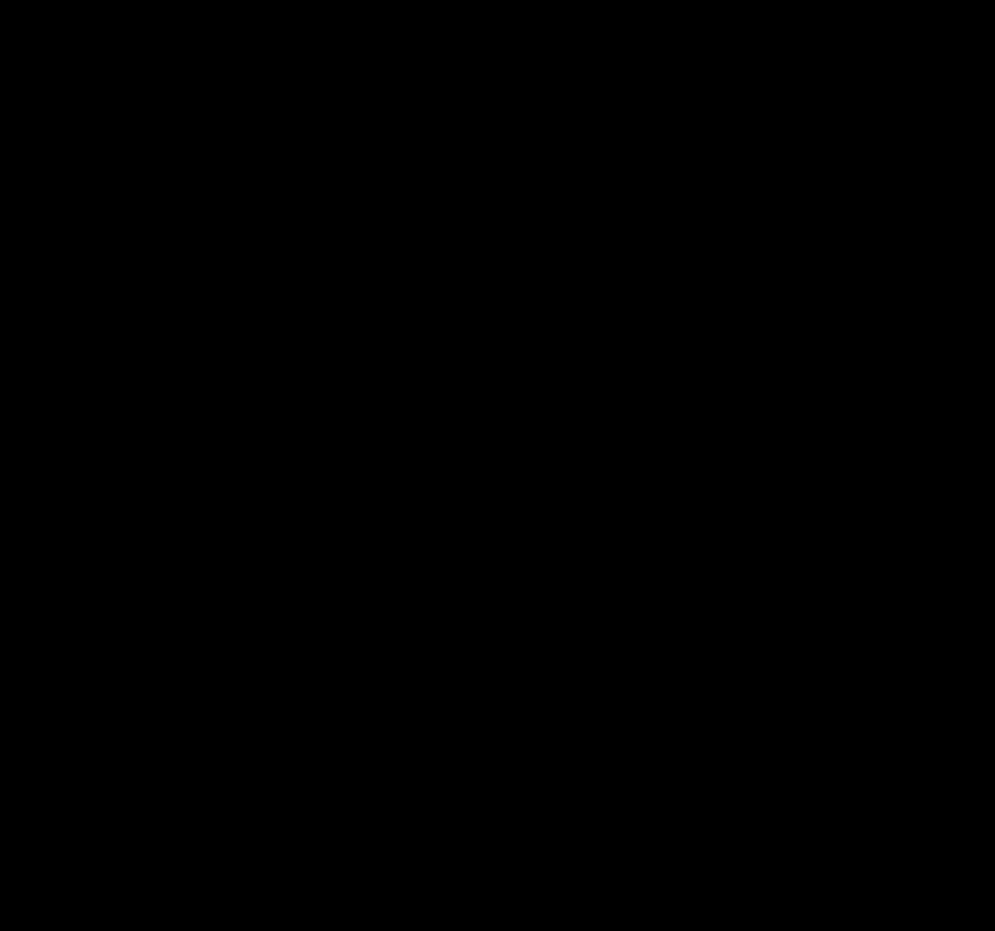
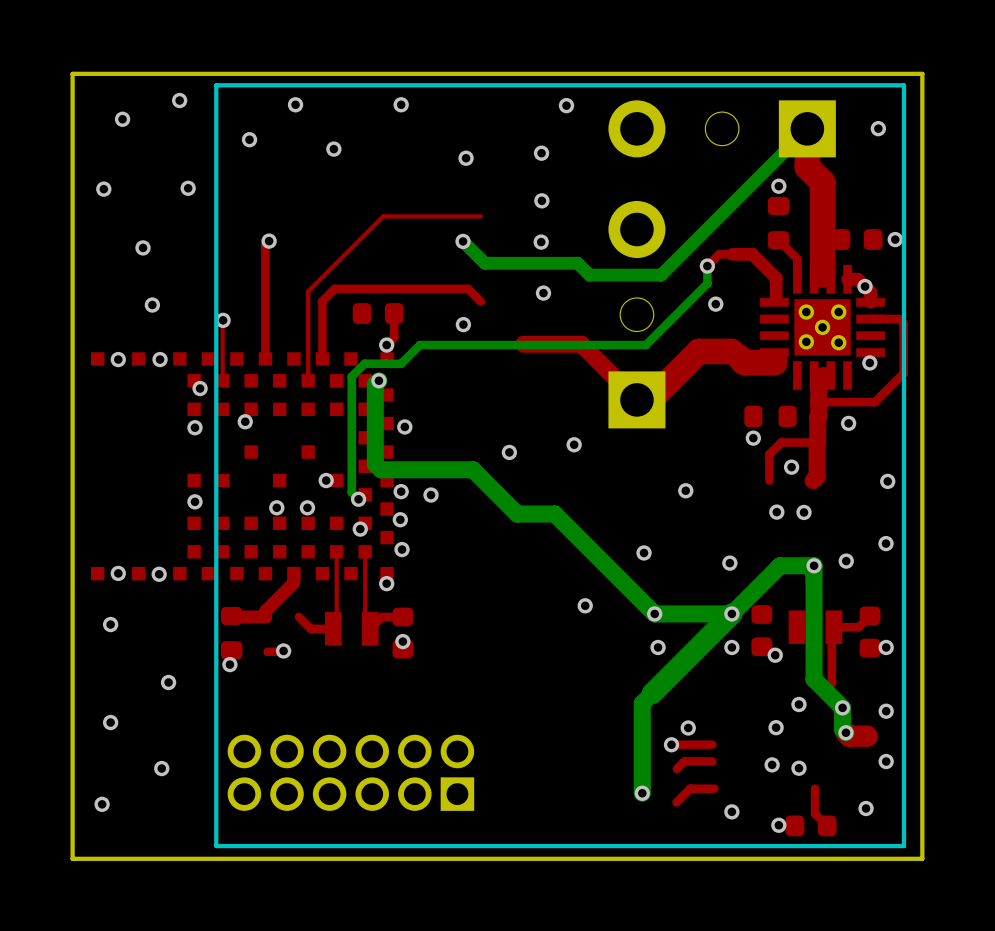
board edge: none -> (922, 73) (72, 73) (72, 858) (922, 858) (922, 73)
line: none -> (903, 85) (216, 85) (216, 846) (903, 846) (903, 85)
via: none -> (179, 100)
via: none -> (295, 104)
via: none -> (401, 104)
via: none -> (566, 105)
via: none -> (122, 119)
part: none -> (722, 128)
top track: none -> (807, 128) (807, 167) (822, 182) (822, 275)
bottom track: none -> (807, 128) (661, 275) (589, 275) (577, 263) (484, 263) (463, 241)
via: none -> (878, 128)
via: none -> (249, 139)
via: none -> (333, 149)
via: none -> (541, 153)
via: none -> (466, 158)
via: none -> (778, 186)
via: none -> (188, 188)
via: none -> (103, 189)
via: none -> (541, 200)
top track: none -> (481, 216) (383, 216) (308, 291) (308, 380)
part: none -> (778, 223)
part: none -> (857, 239)
via: none -> (895, 239)
top track: none -> (778, 240) (797, 259) (797, 279)
top track: none -> (269, 241) (265, 244) (265, 358)
via: none -> (269, 241)
via: none -> (463, 241)
via: none -> (541, 242)
via: none -> (143, 247)
top track: none -> (707, 266) (719, 254) (752, 254) (776, 278) (776, 298)
bottom track: none -> (707, 266) (707, 283) (645, 345) (419, 345) (401, 363) (386, 363)
via: none -> (707, 266)
top track: none -> (847, 279) (857, 279) (870, 292) (870, 302)
via: none -> (865, 286)
via: none -> (543, 293)
top track: none -> (481, 301) (468, 288) (334, 288) (322, 301) (322, 358)
via: none -> (715, 304)
via: none -> (152, 305)
part: none -> (378, 313)
top track: none -> (394, 313) (394, 337) (386, 345)
part: none -> (636, 314)
top track: none -> (870, 319) (899, 319) (903, 323) (903, 373) (874, 402) (818, 401)
top track: none -> (222, 320) (222, 380)
via: none -> (223, 320)
via: none -> (463, 324)
part: none -> (822, 327)
top track: none -> (523, 344) (581, 344) (636, 399) (650, 399) (699, 351) (732, 350) (744, 362) (774, 362)
via: none -> (386, 345)
via: none -> (118, 359)
via: none -> (160, 359)
via: none -> (869, 362)
bottom track: none -> (385, 363) (364, 363) (351, 376) (351, 492) (358, 499)
top track: none -> (823, 375) (818, 380) (818, 416)
bottom track: none -> (378, 380) (375, 384) (375, 464) (381, 469) (473, 469) (517, 514) (554, 514) (654, 613) (731, 613) (652, 693)
via: none -> (378, 380)
via: none -> (200, 388)
part: none -> (770, 416)
top track: none -> (818, 416) (817, 442) (781, 442) (769, 454) (769, 480)
via: none -> (245, 421)
via: none -> (848, 423)
via: none -> (404, 426)
via: none -> (194, 427)
via: none -> (753, 438)
top track: none -> (817, 442) (817, 476) (813, 480)
via: none -> (574, 444)
via: none -> (509, 452)
part: none -> (242, 466)
via: none -> (791, 467)
via: none -> (326, 480)
via: none -> (887, 481)
via: none -> (685, 490)
via: none -> (401, 491)
via: none -> (431, 495)
via: none -> (358, 499)
via: none -> (194, 501)
via: none -> (276, 507)
via: none -> (307, 507)
via: none -> (776, 512)
via: none -> (804, 512)
via: none -> (400, 519)
via: none -> (360, 529)
via: none -> (886, 543)
via: none -> (402, 549)
top track: none -> (336, 551) (336, 625) (333, 628) (310, 628) (298, 616)
top track: none -> (365, 551) (365, 623) (370, 628) (382, 616) (402, 616)
via: none -> (644, 552)
via: none -> (846, 561)
via: none -> (729, 563)
via: none -> (814, 565)
via: none -> (118, 573)
top track: none -> (293, 573) (293, 582) (265, 610) (265, 616) (231, 616)
via: none -> (159, 574)
via: none -> (386, 583)
via: none -> (585, 605)
via: none -> (654, 613)
via: none -> (731, 613)
top track: none -> (870, 615) (858, 627) (833, 627) (831, 629) (831, 683)
via: none -> (110, 624)
part: none -> (815, 627)
part: none -> (351, 628)
part: none -> (761, 630)
part: none -> (870, 632)
part: none -> (231, 633)
part: none -> (402, 633)
via: none -> (402, 641)
via: none -> (658, 647)
via: none -> (731, 647)
via: none -> (886, 647)
top track: none -> (283, 650) (267, 651)
via: none -> (283, 650)
via: none -> (775, 655)
via: none -> (229, 664)
via: none -> (168, 682)
via: none -> (798, 704)
via: none -> (842, 707)
via: none -> (886, 711)
via: none -> (110, 722)
via: none -> (688, 727)
via: none -> (776, 727)
top track: none -> (849, 727) (845, 731) (849, 736) (867, 736)
bottom track: none -> (845, 732) (842, 729) (842, 707) (814, 679) (814, 565) (780, 565) (642, 703) (642, 793)
via: none -> (845, 732)
via: none -> (671, 744)
top track: none -> (712, 744) (671, 744)
top track: none -> (712, 761) (684, 761) (676, 768)
via: none -> (886, 761)
via: none -> (772, 764)
via: none -> (161, 768)
via: none -> (798, 768)
part: none -> (350, 772)
top track: none -> (714, 788) (690, 788) (676, 802)
top track: none -> (815, 788) (815, 813) (827, 825)
via: none -> (642, 793)
via: none -> (102, 804)
via: none -> (866, 808)
via: none -> (731, 811)
via: none -> (778, 825)
part: none -> (811, 825)

